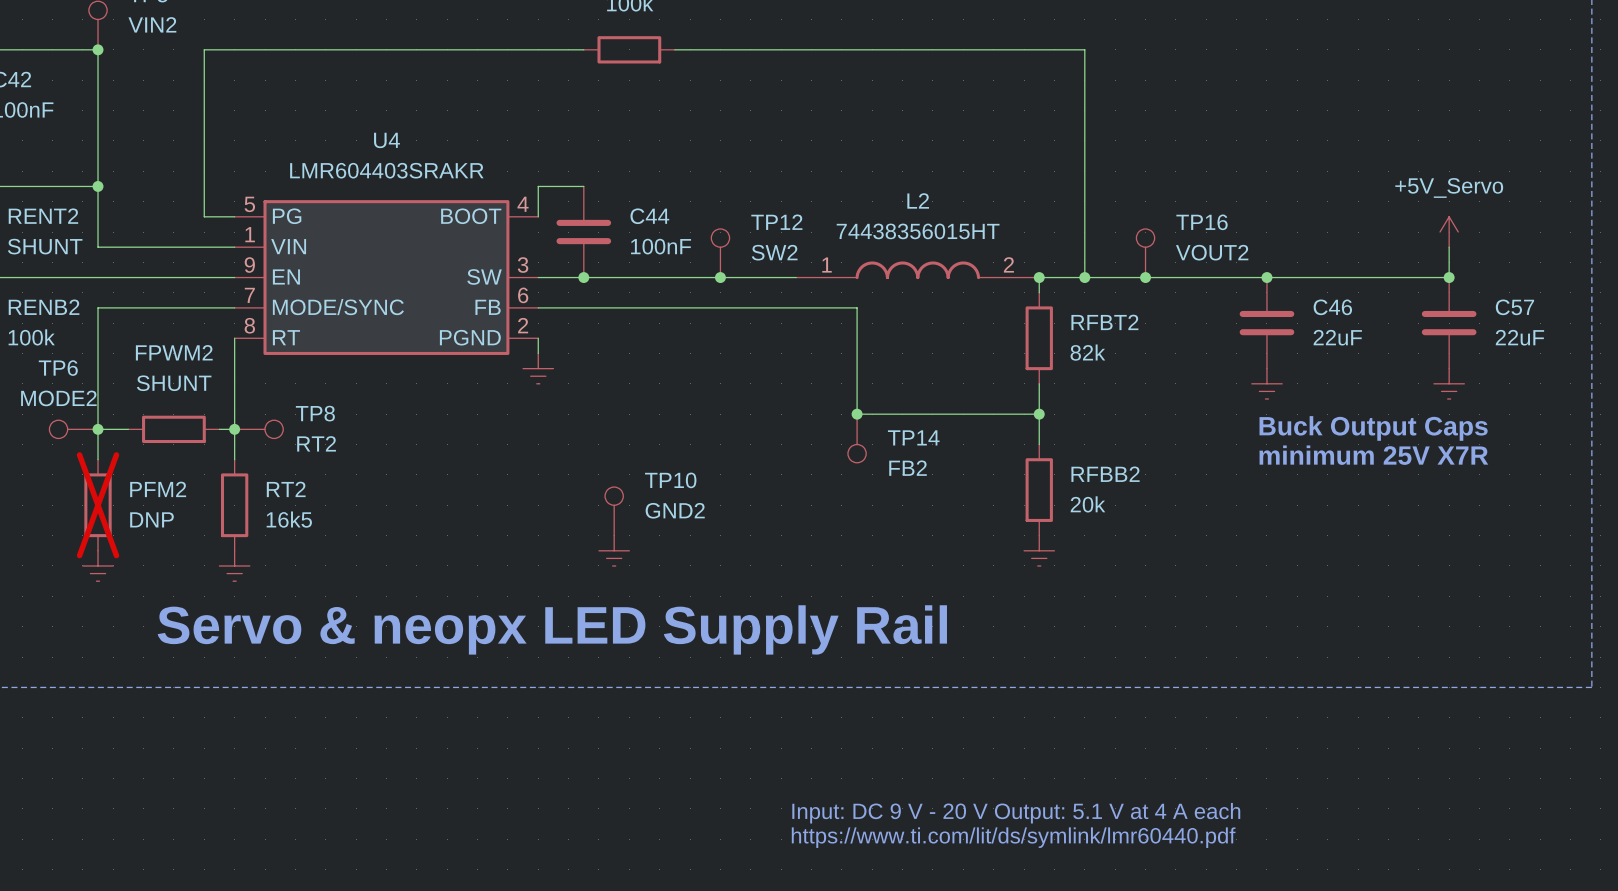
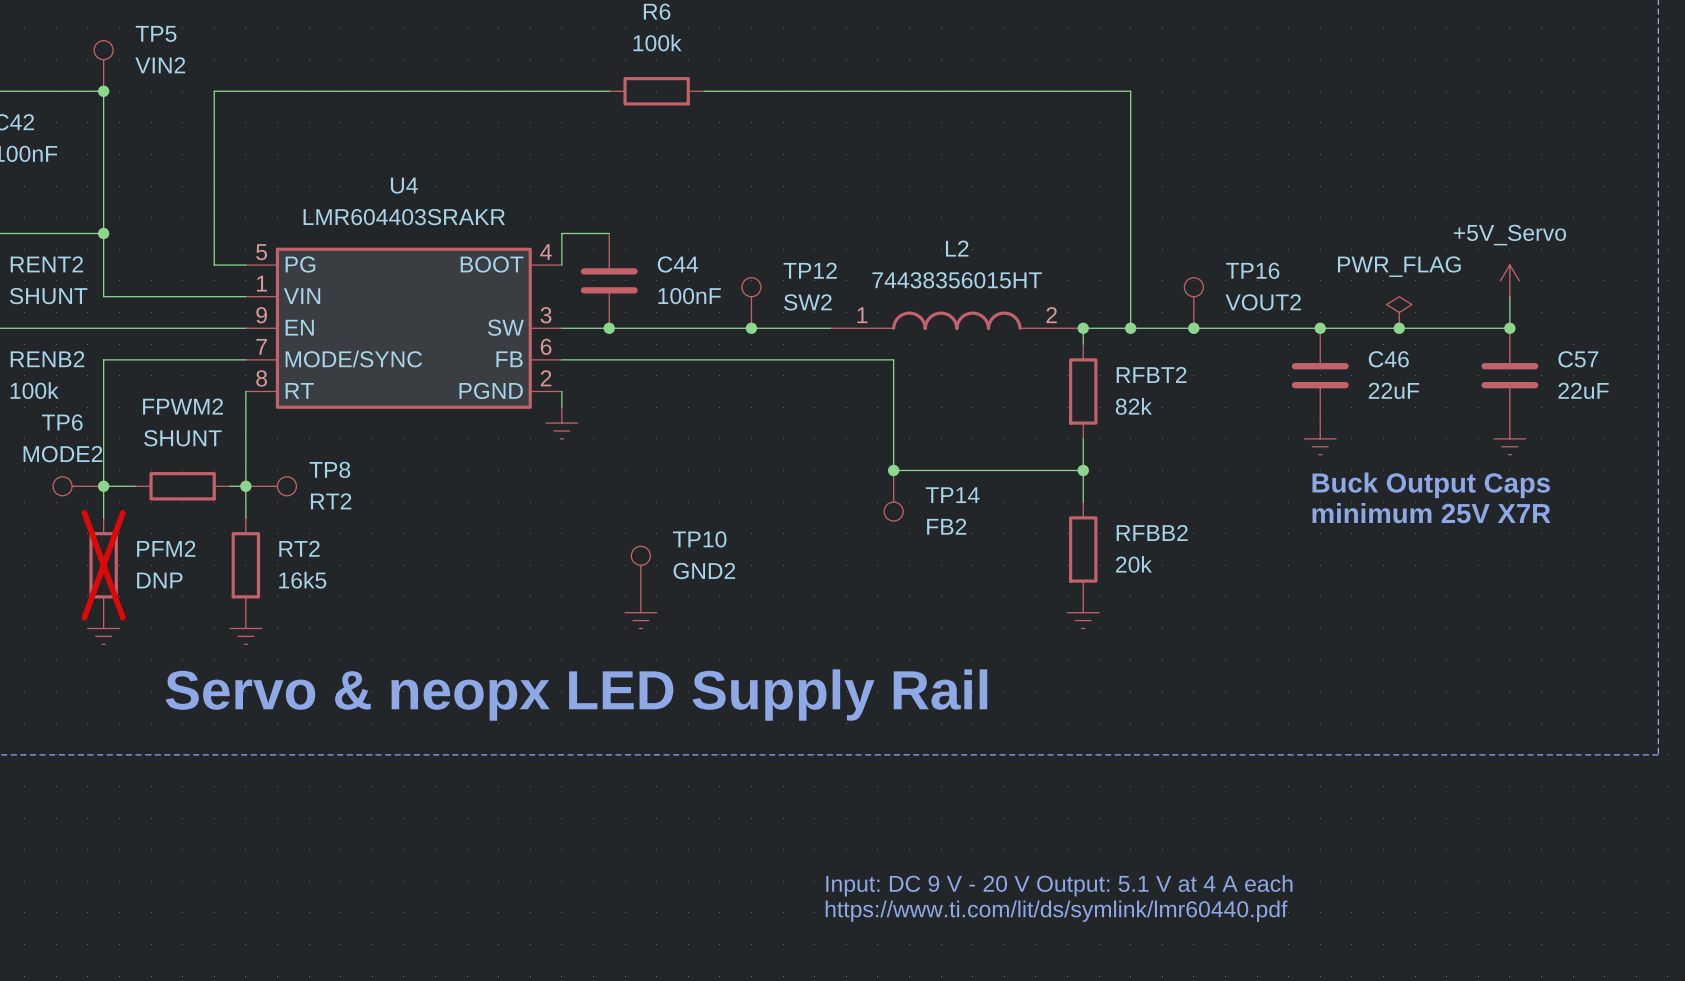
power symbol: none -> PWR_FLAG (1399, 312)
junction: none -> (1399, 328)

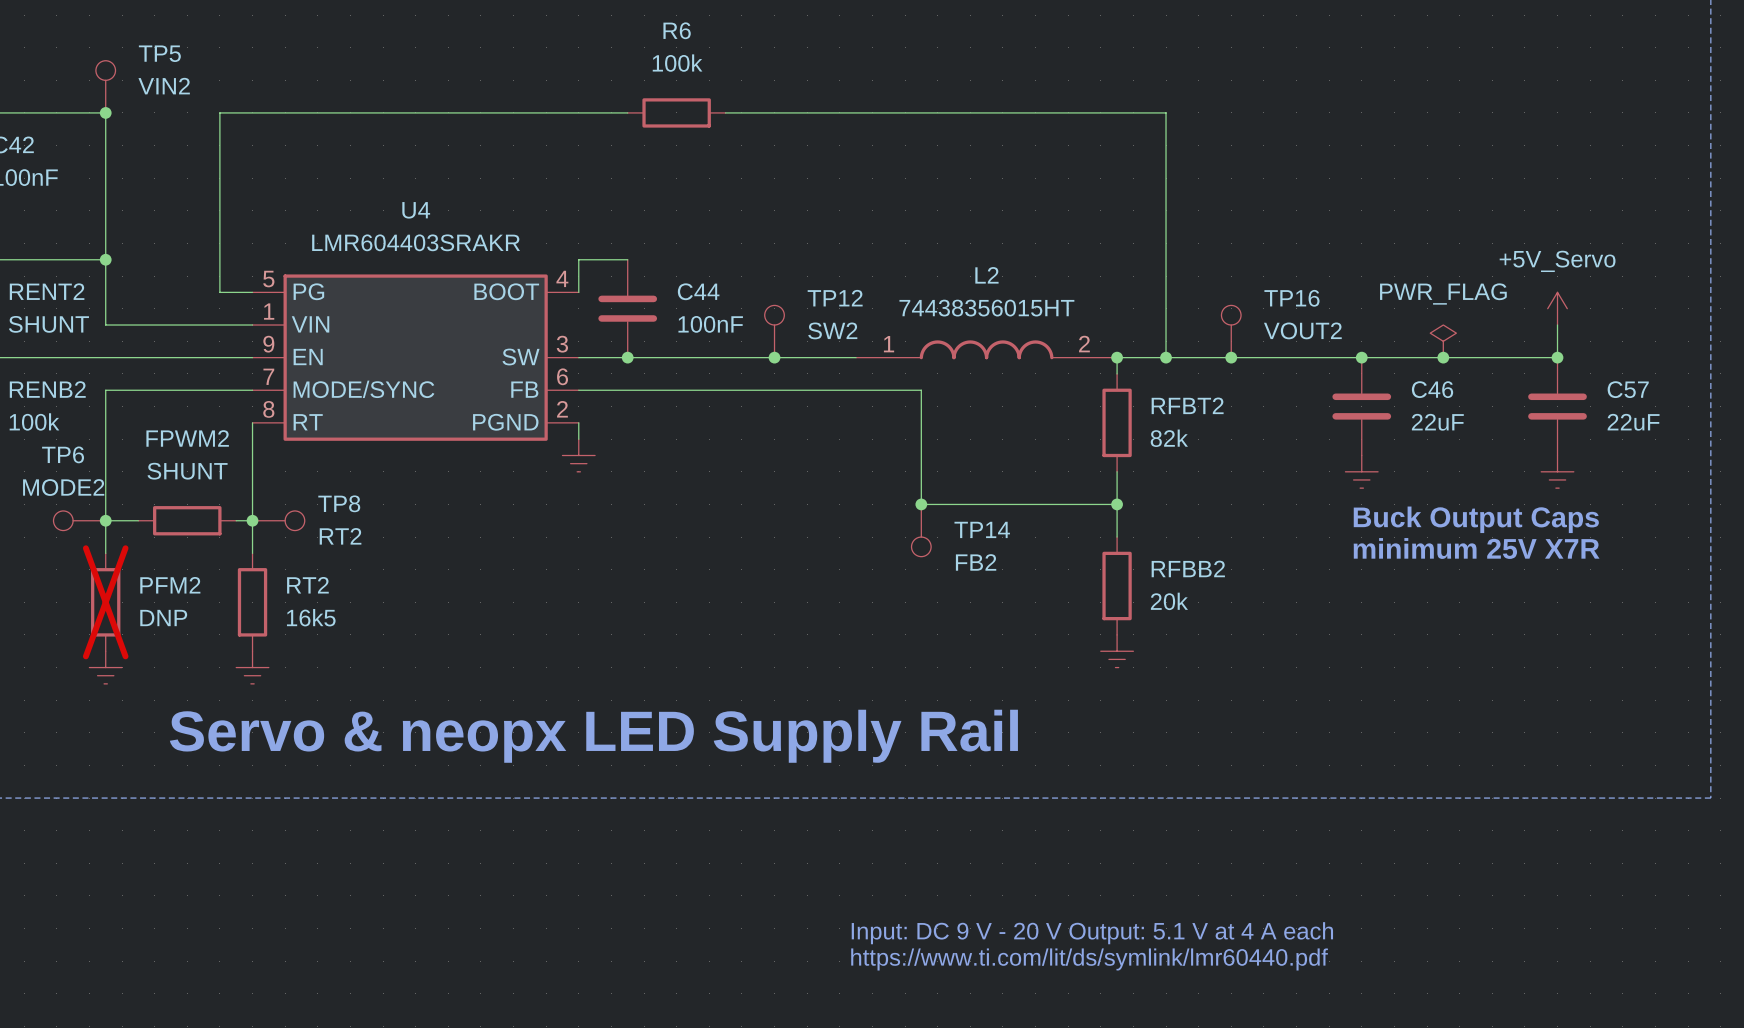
TP10: GND2 (640, 571) -> none
power symbol: (640, 612) -> none

